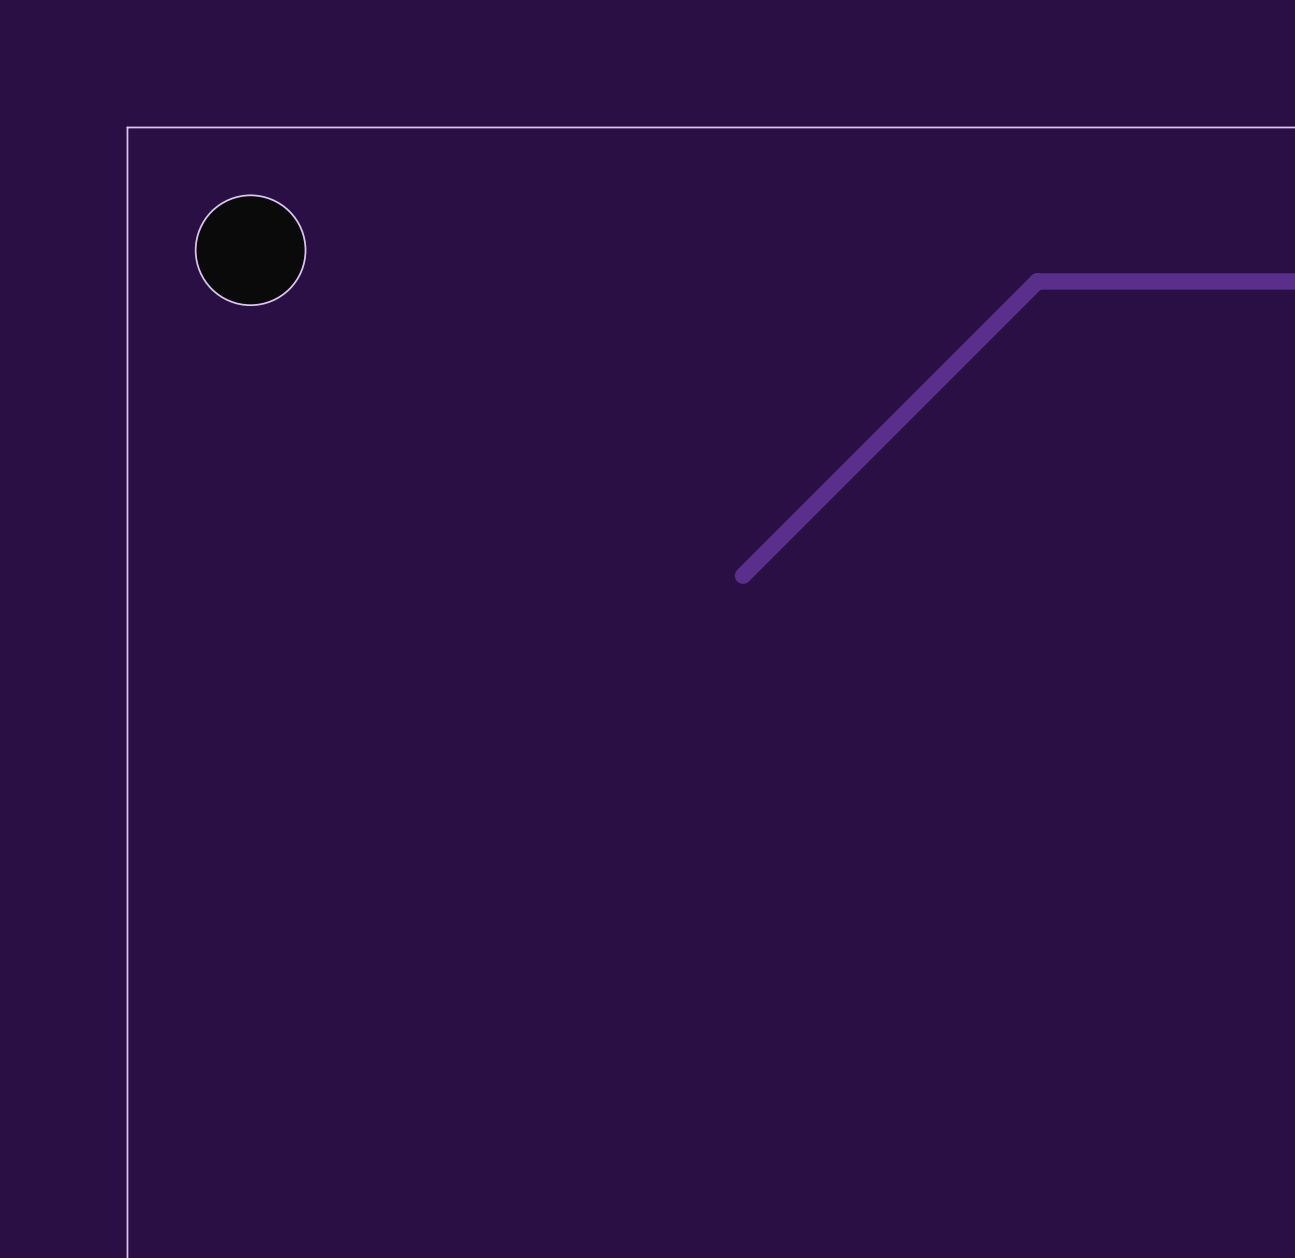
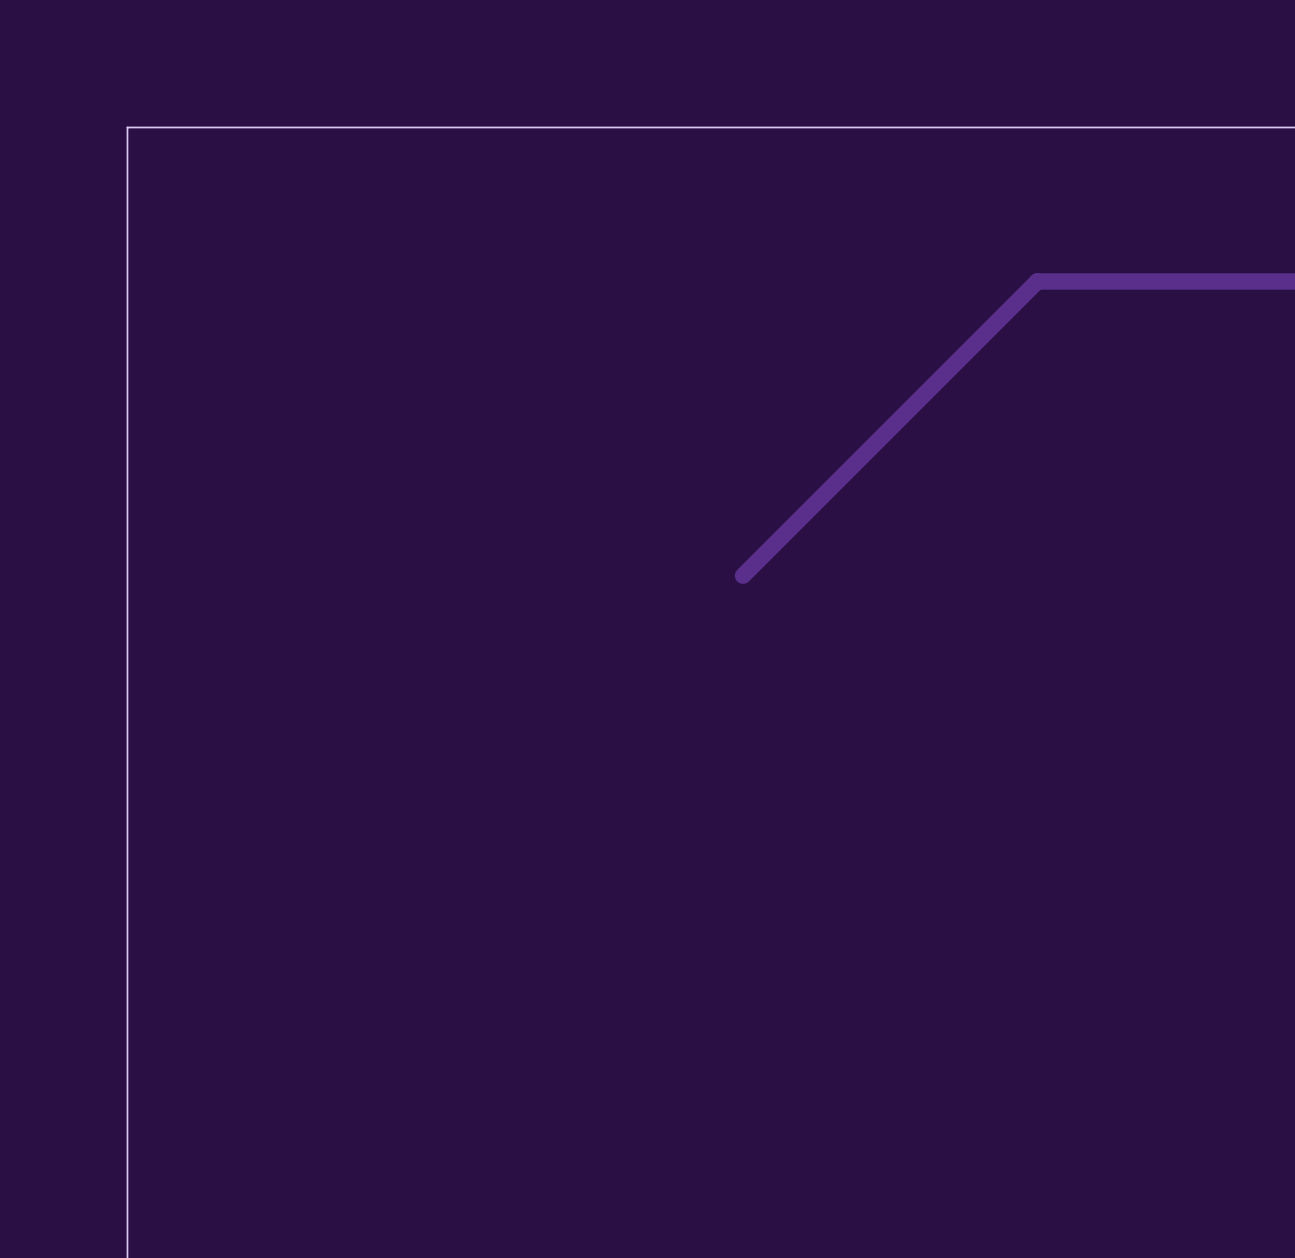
part: (250, 250) -> none

